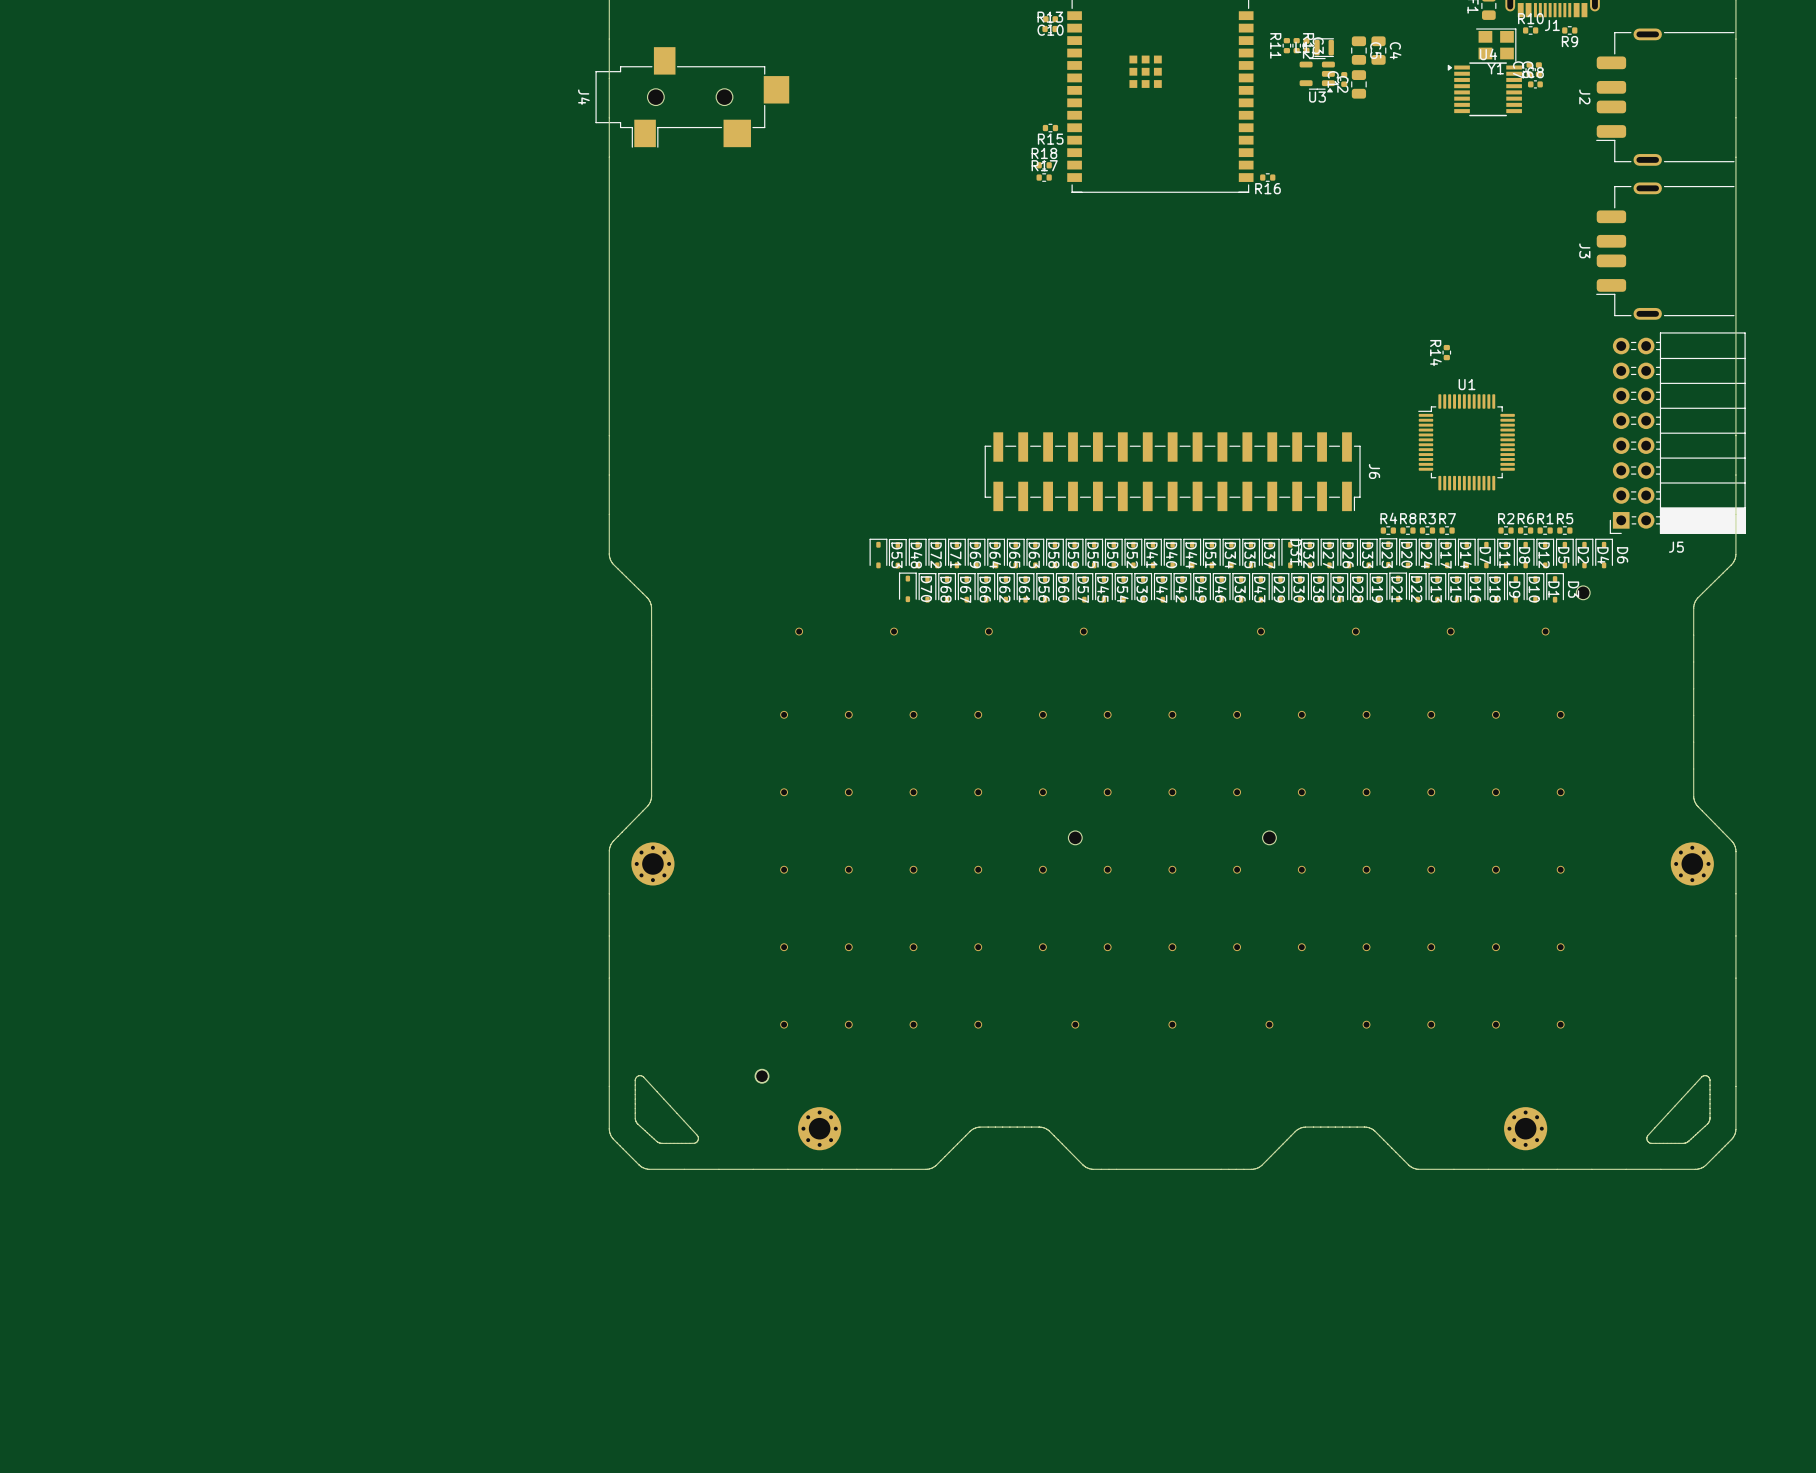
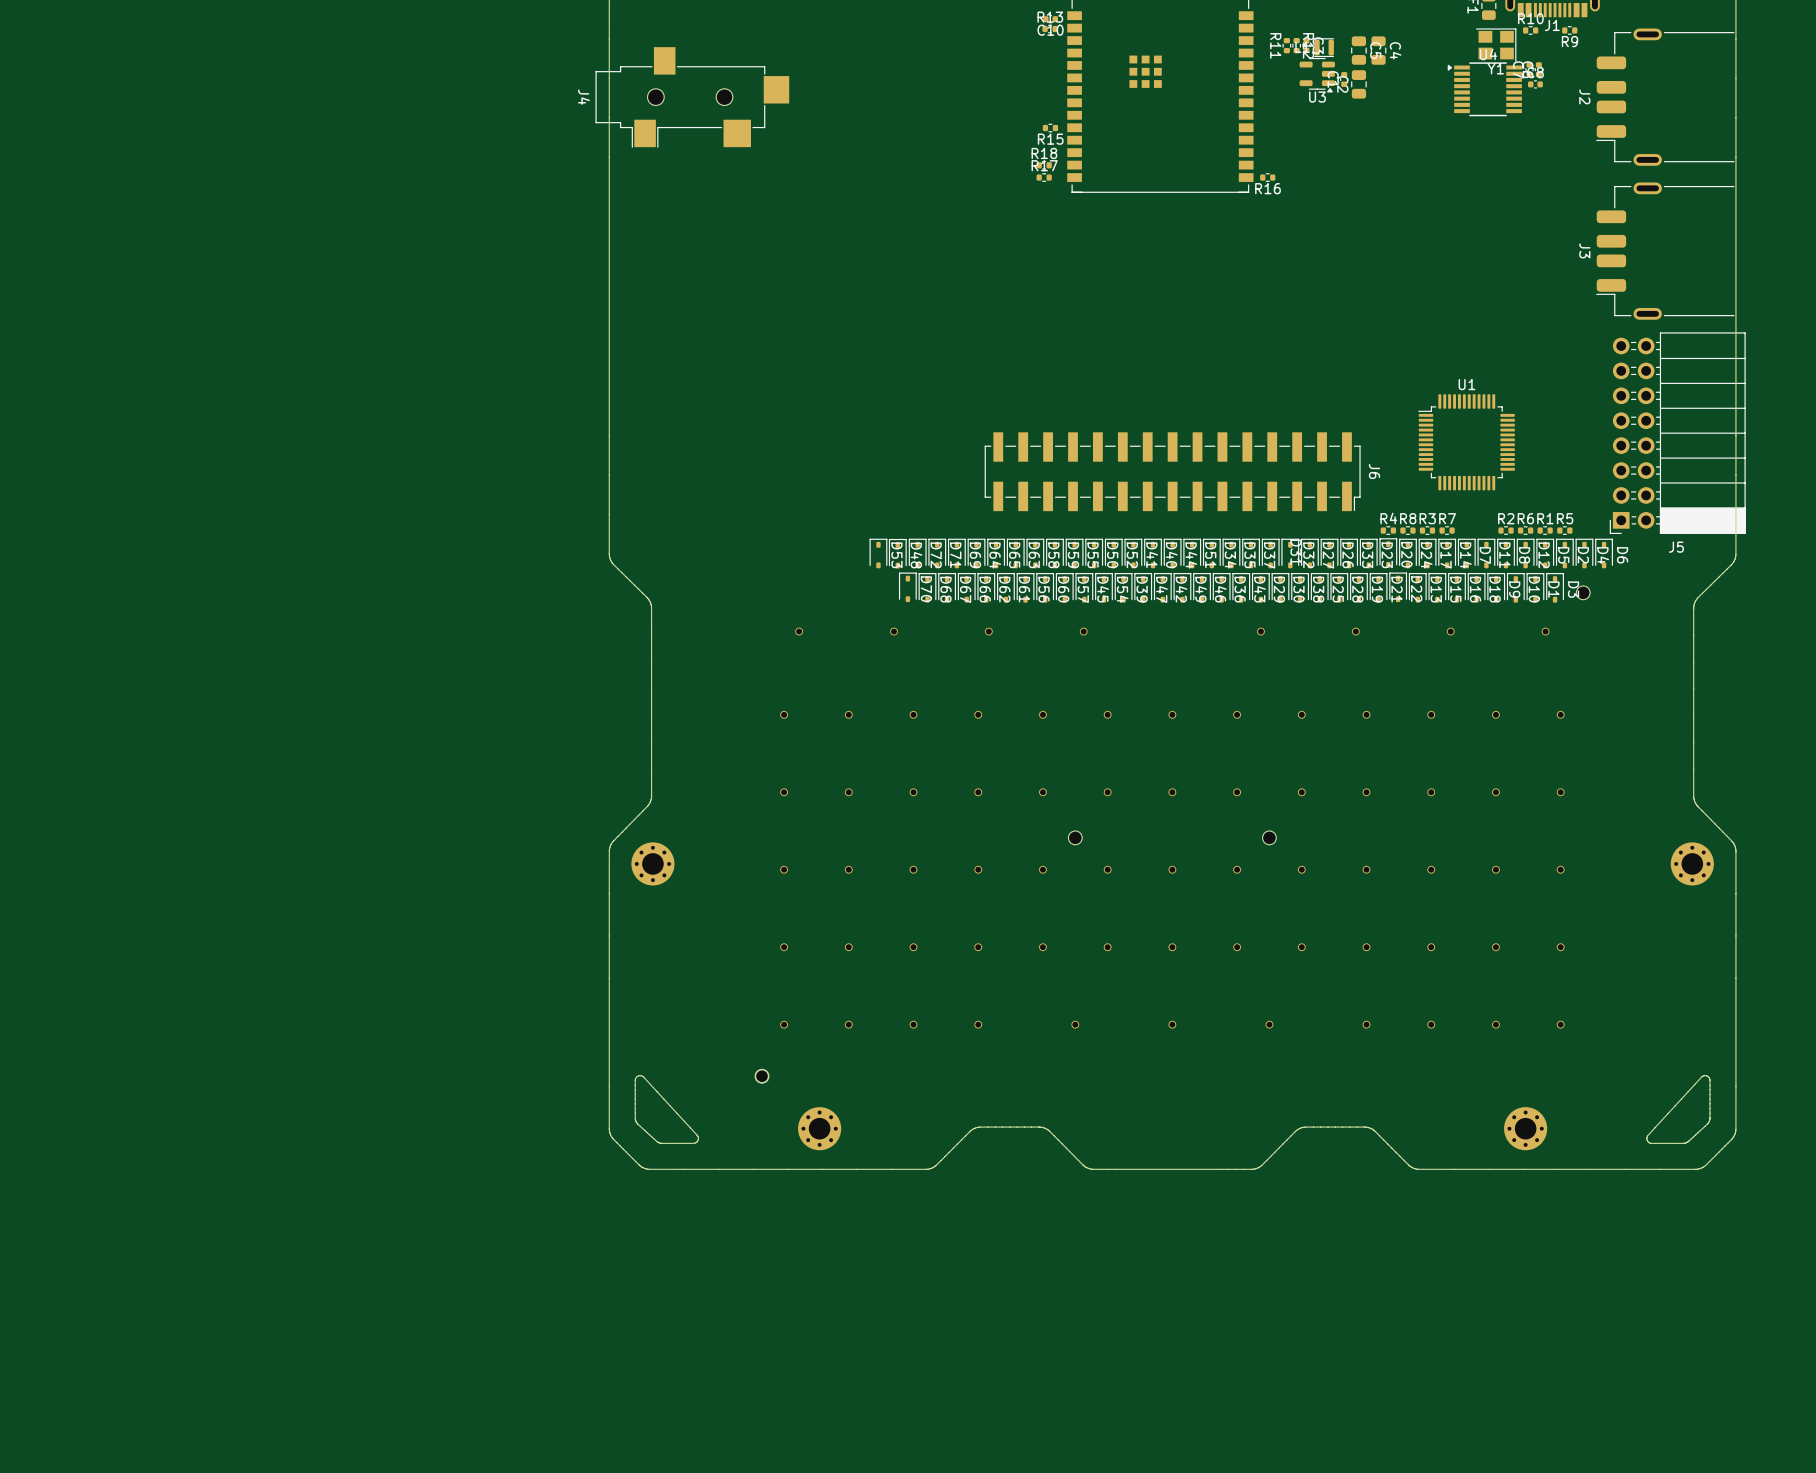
R14: (1446, 352) -> none

